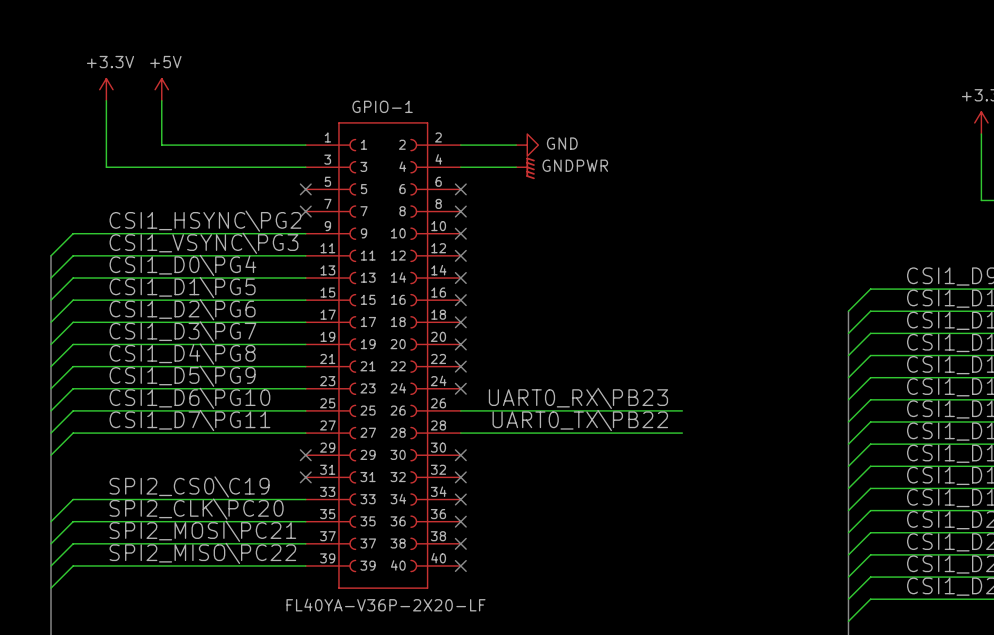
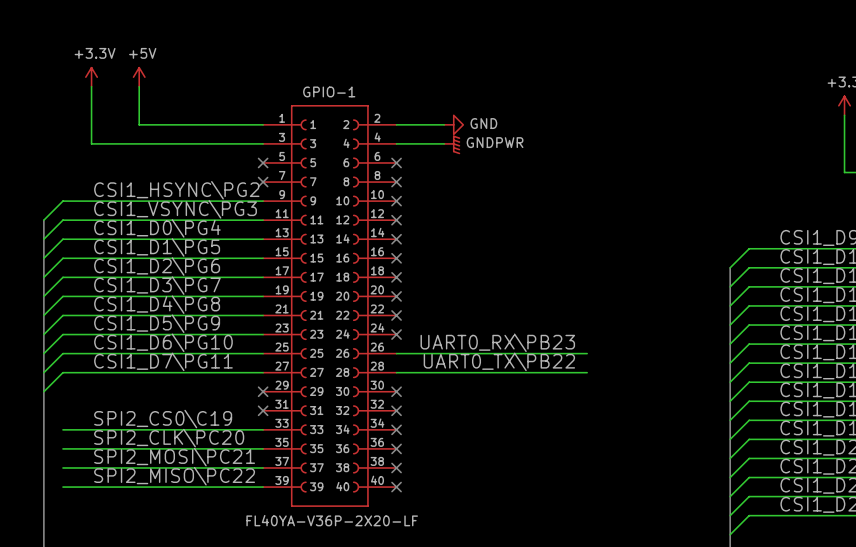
wire: (73, 499) (51, 521) -> none
wire: (73, 521) (51, 543) -> none
wire: (73, 543) (51, 565) -> none
wire: (73, 565) (51, 588) -> none

